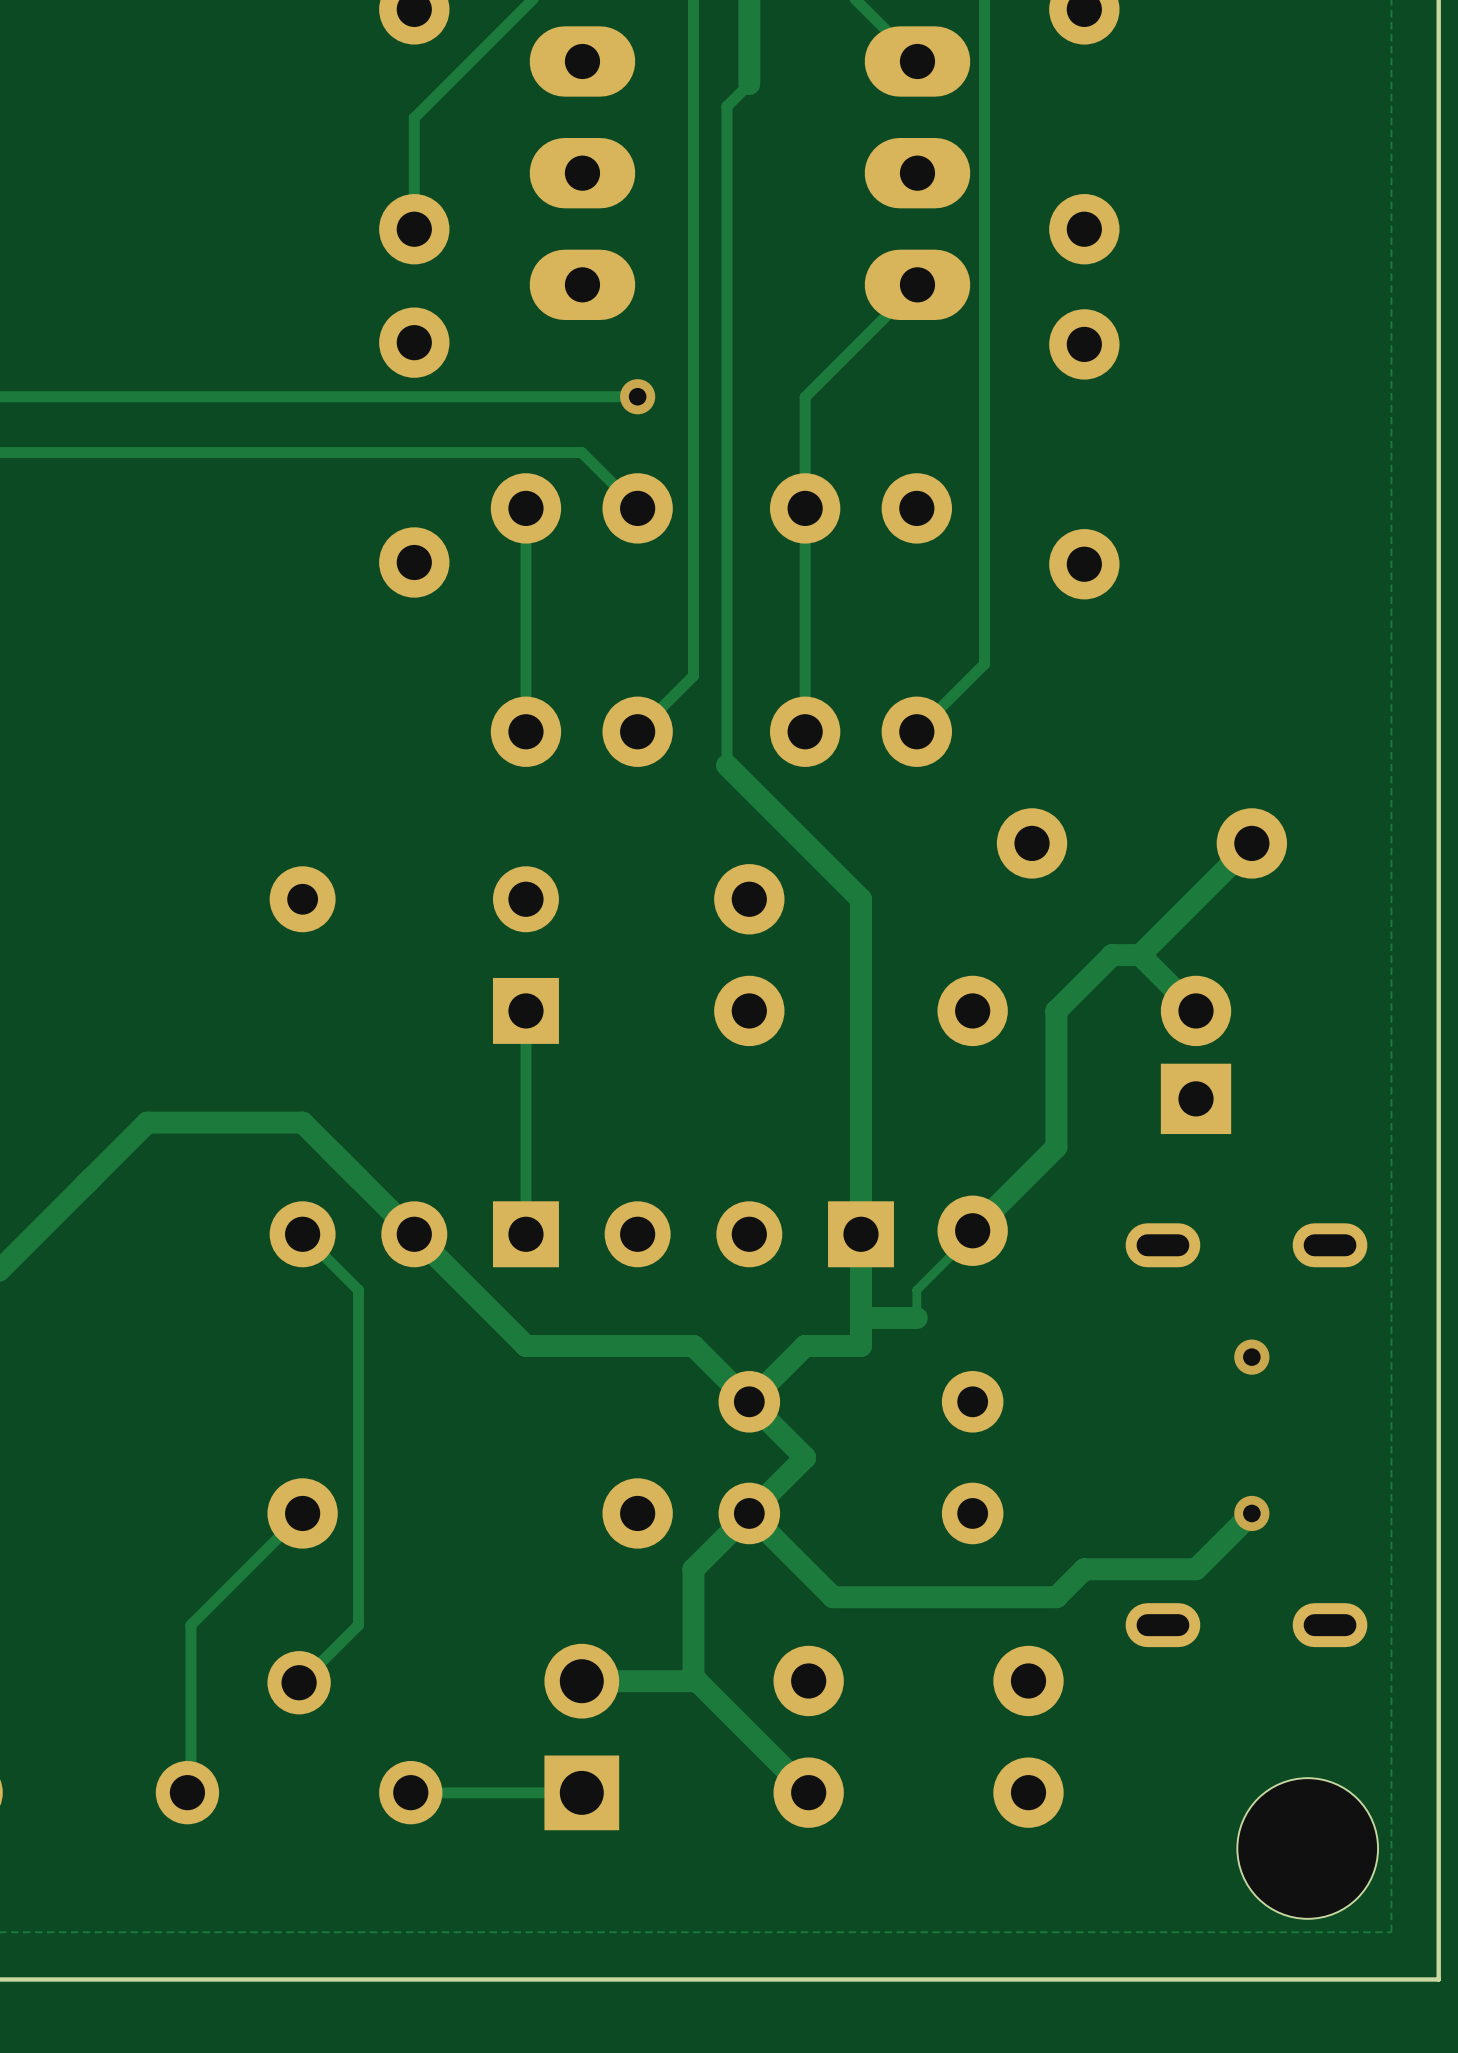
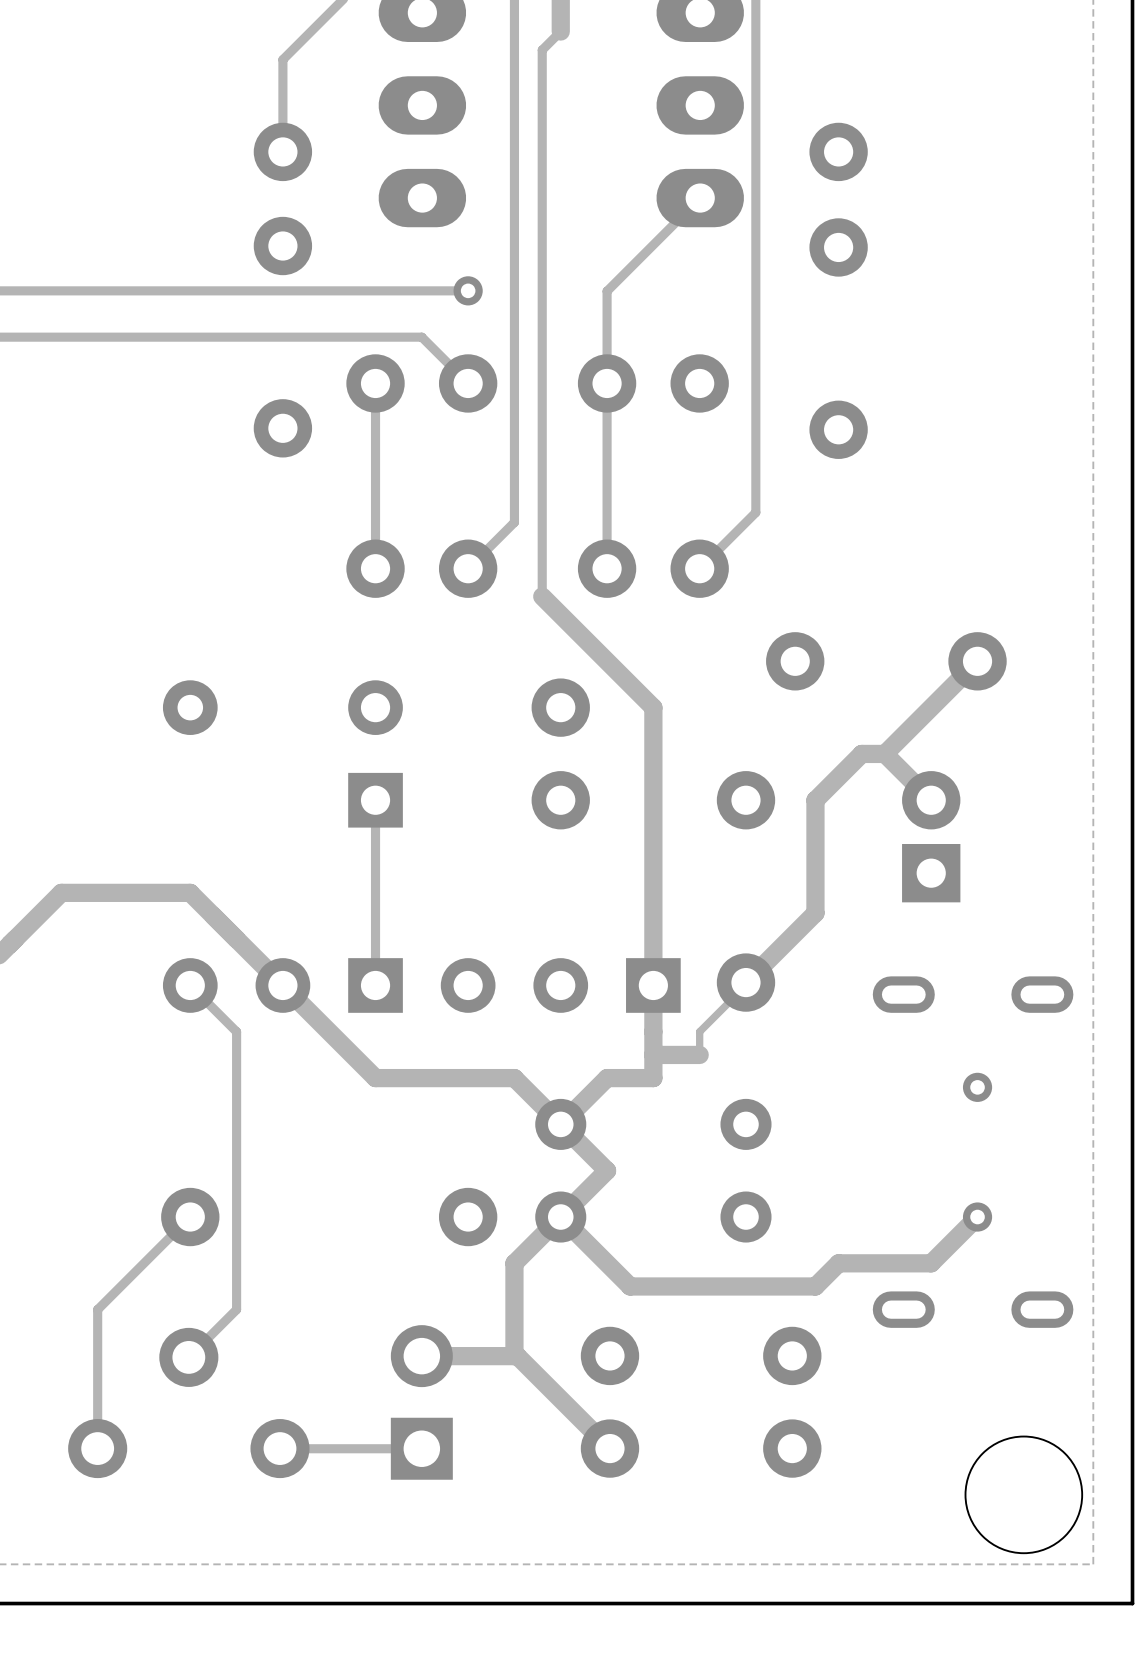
part footprint: [155, 1651, 443, 1825] -> [68, 1327, 310, 1479]

